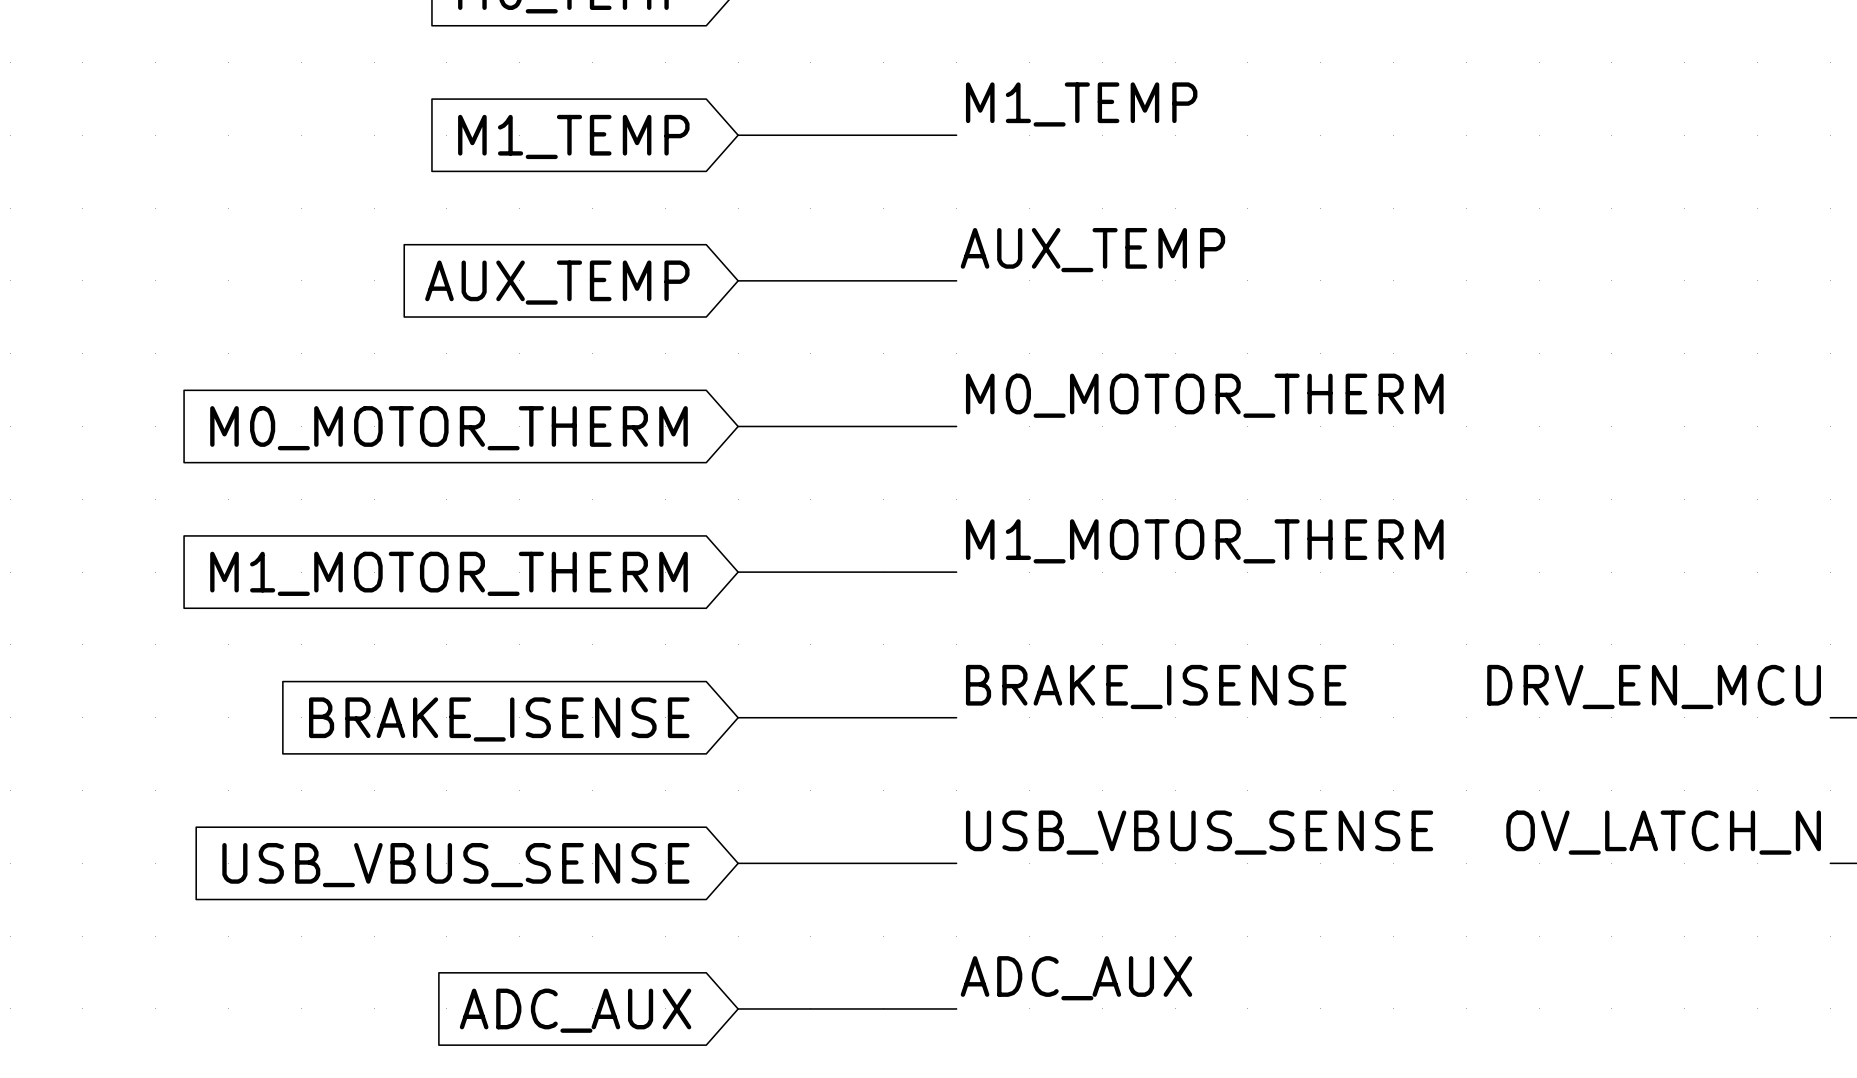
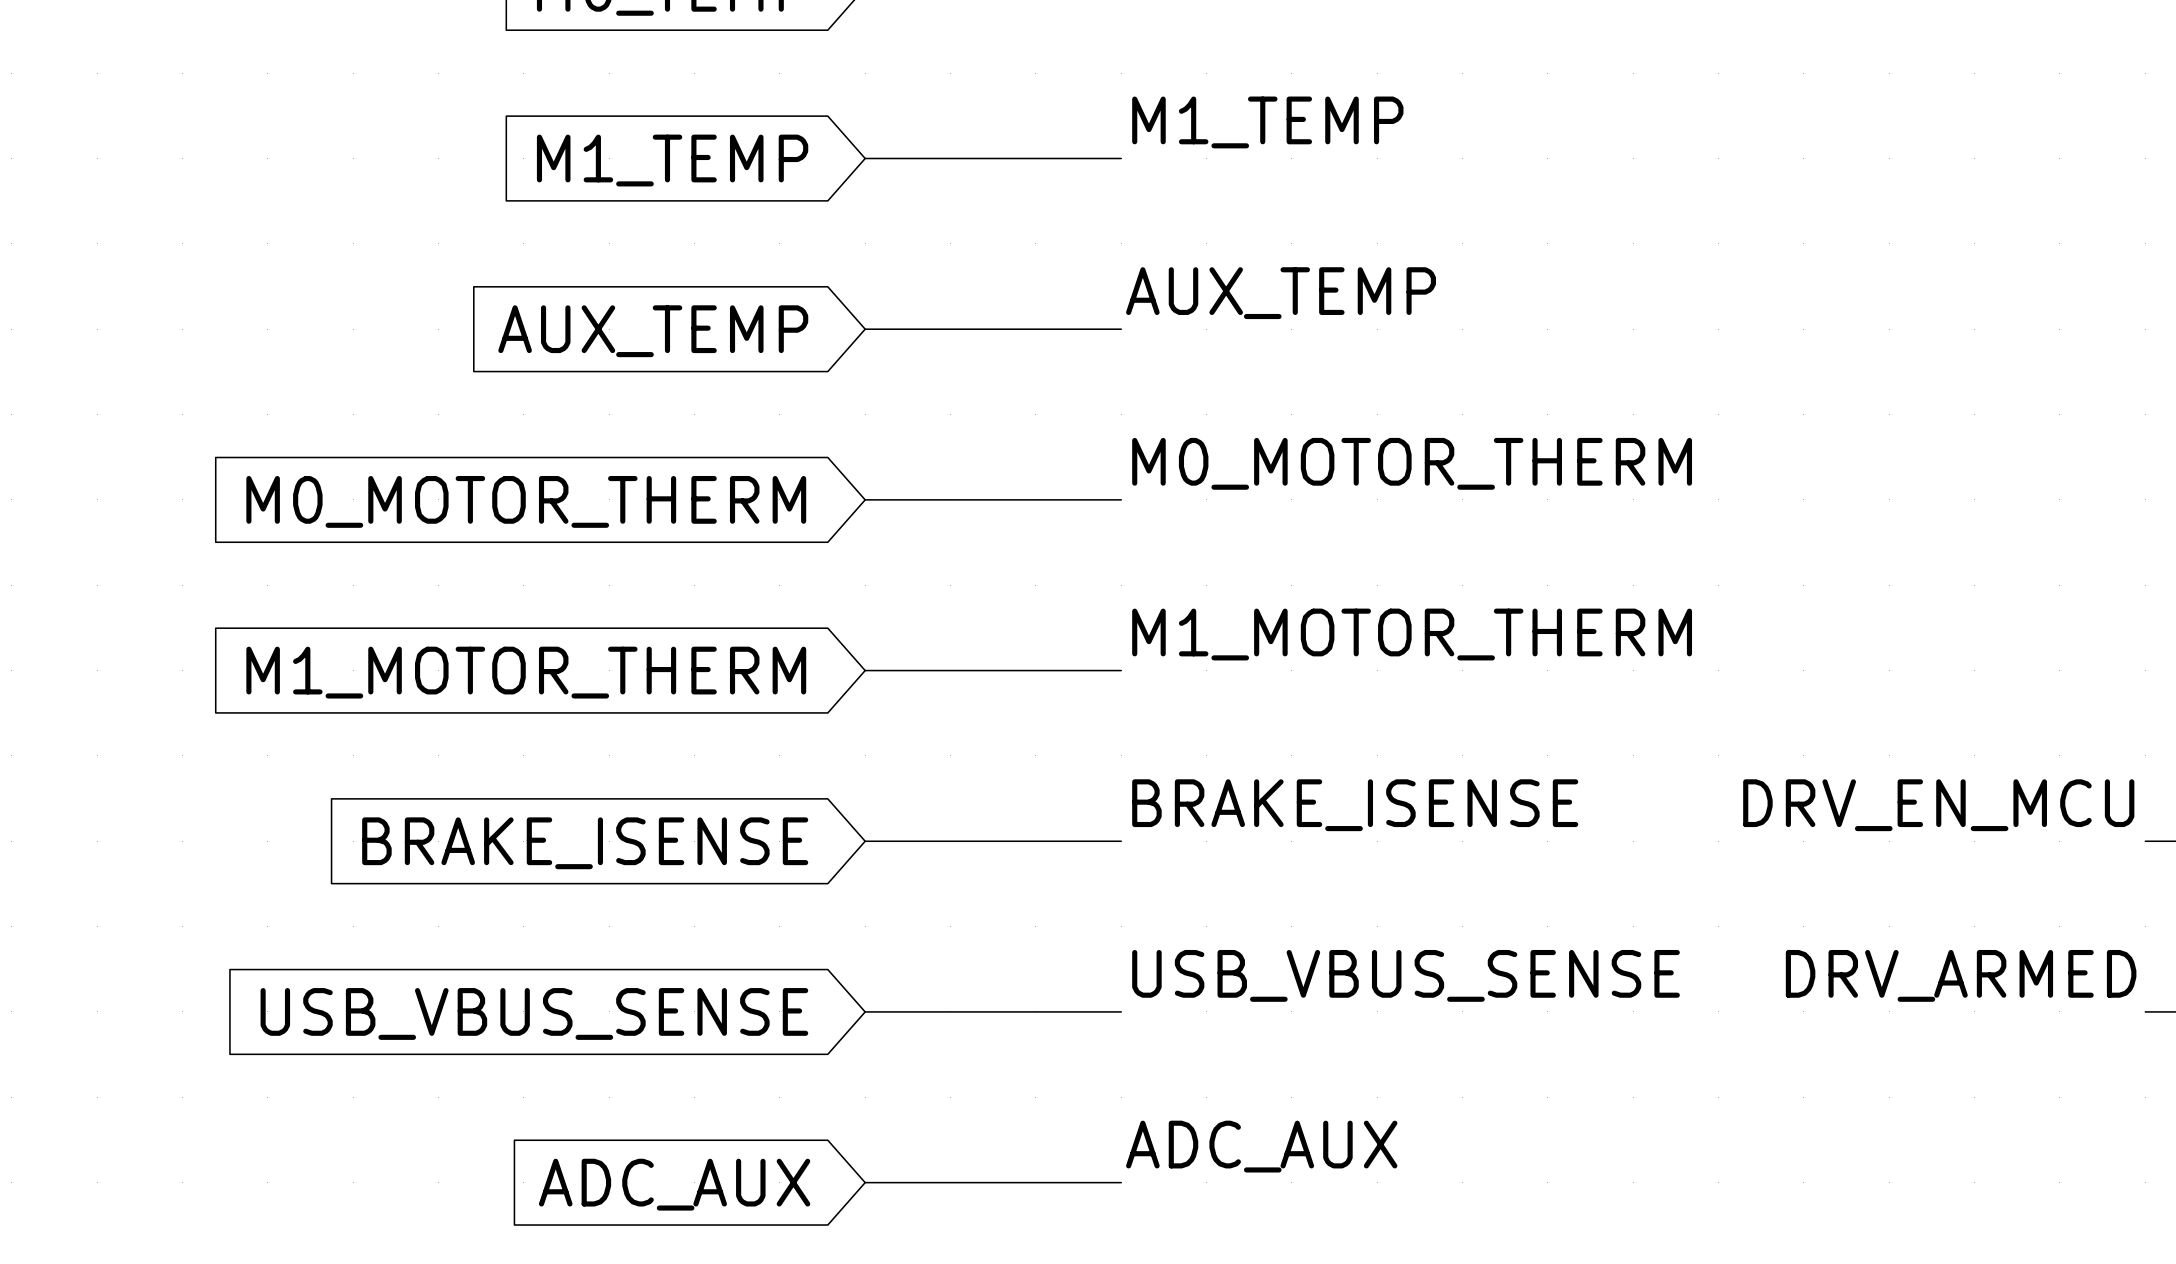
label: OV_LATCH_N (1663, 832) -> DRV_ARMED (1961, 975)

